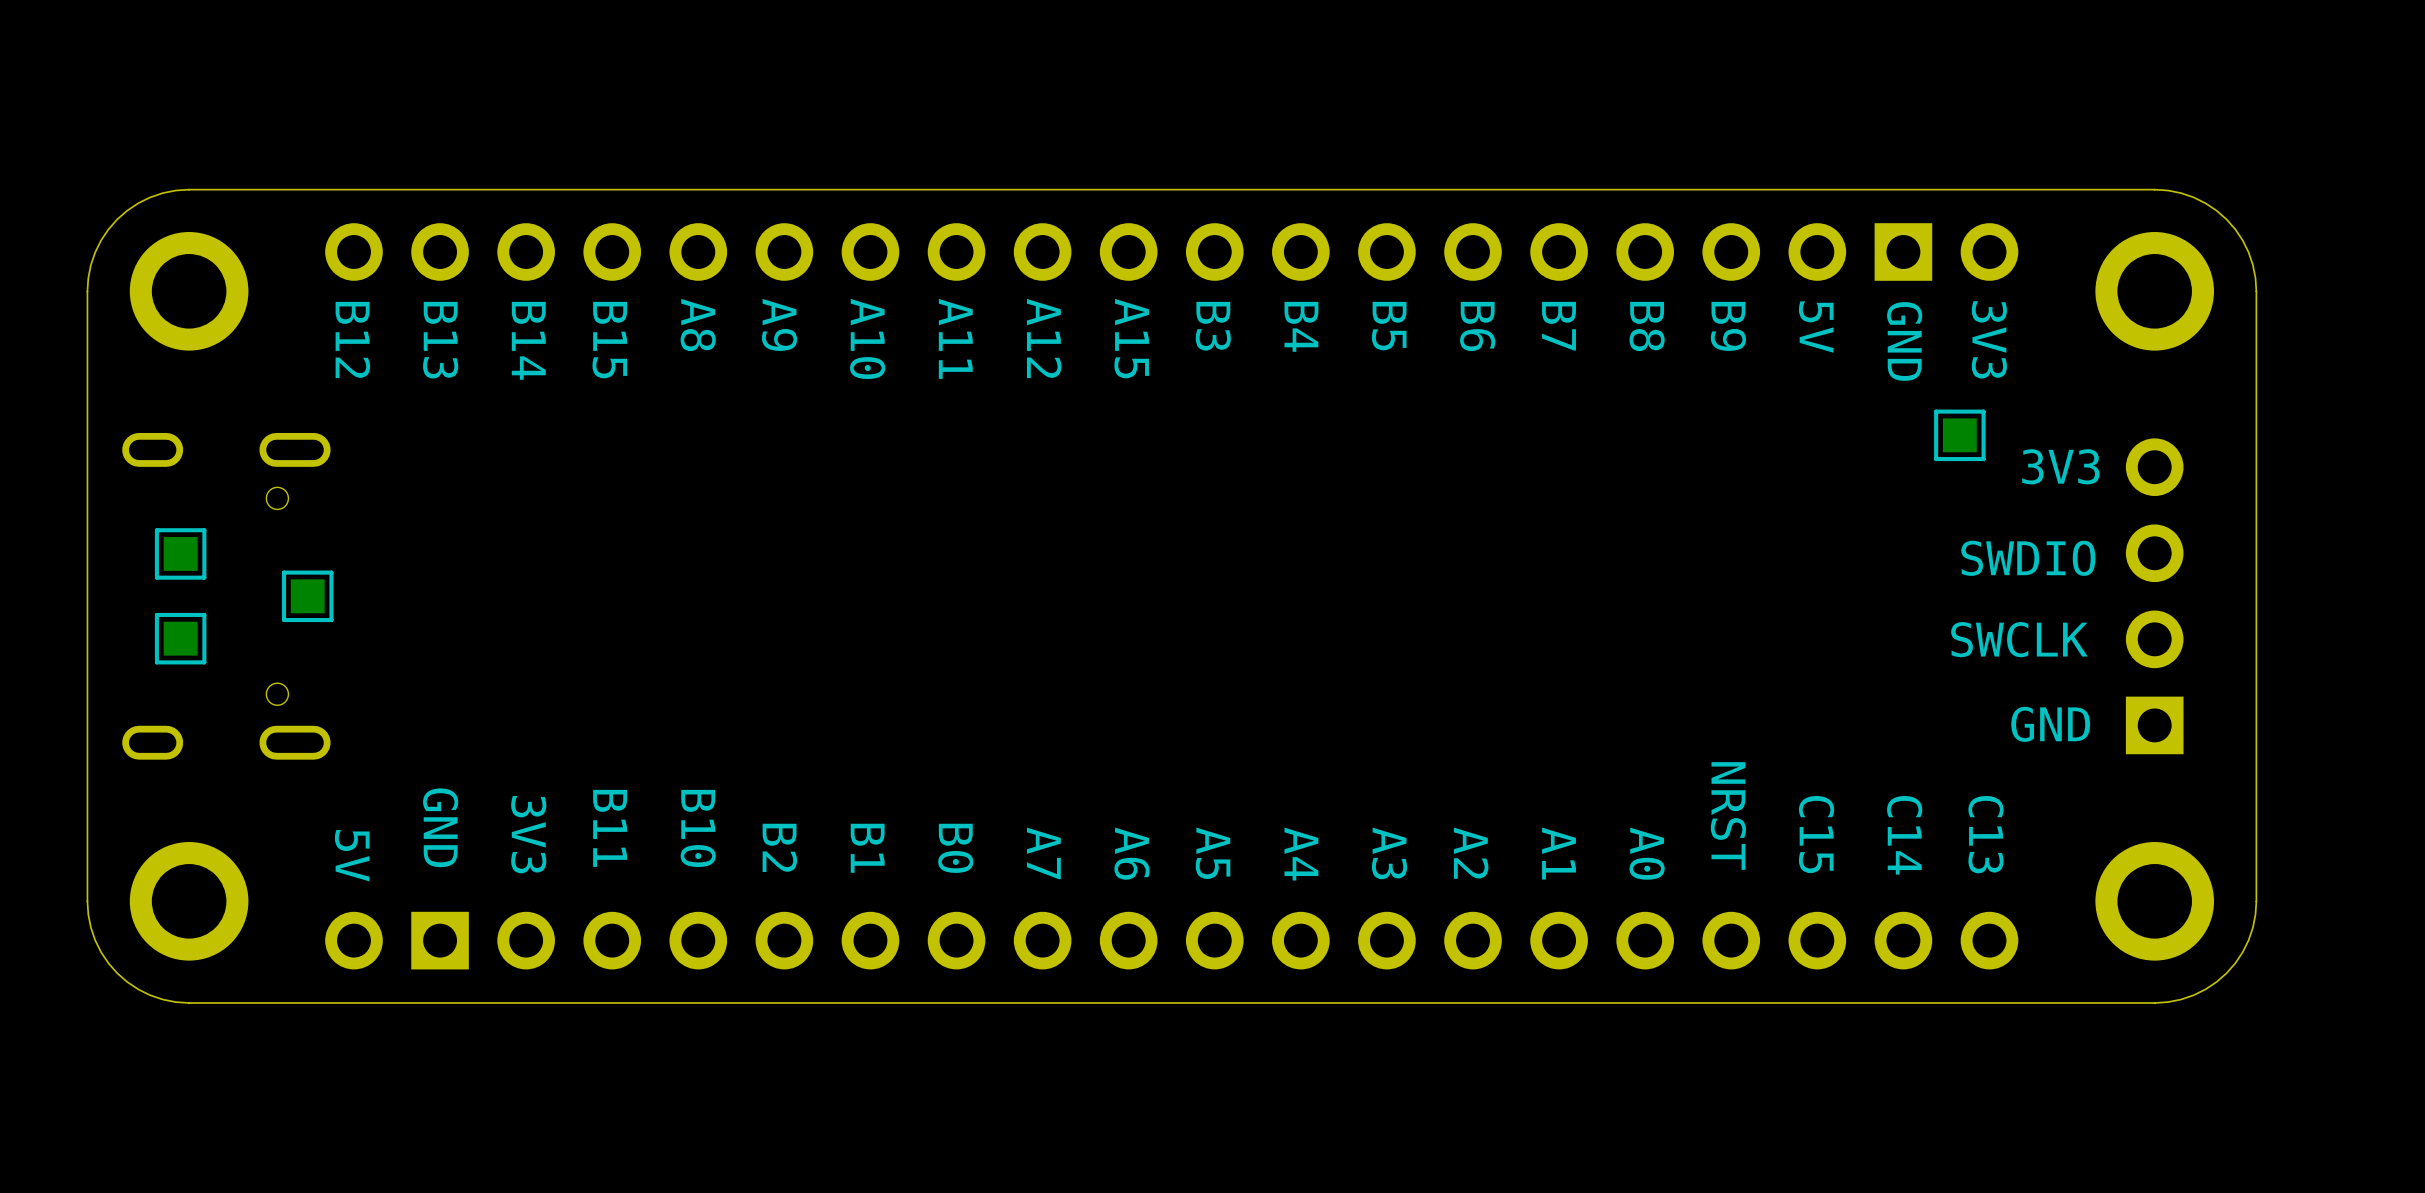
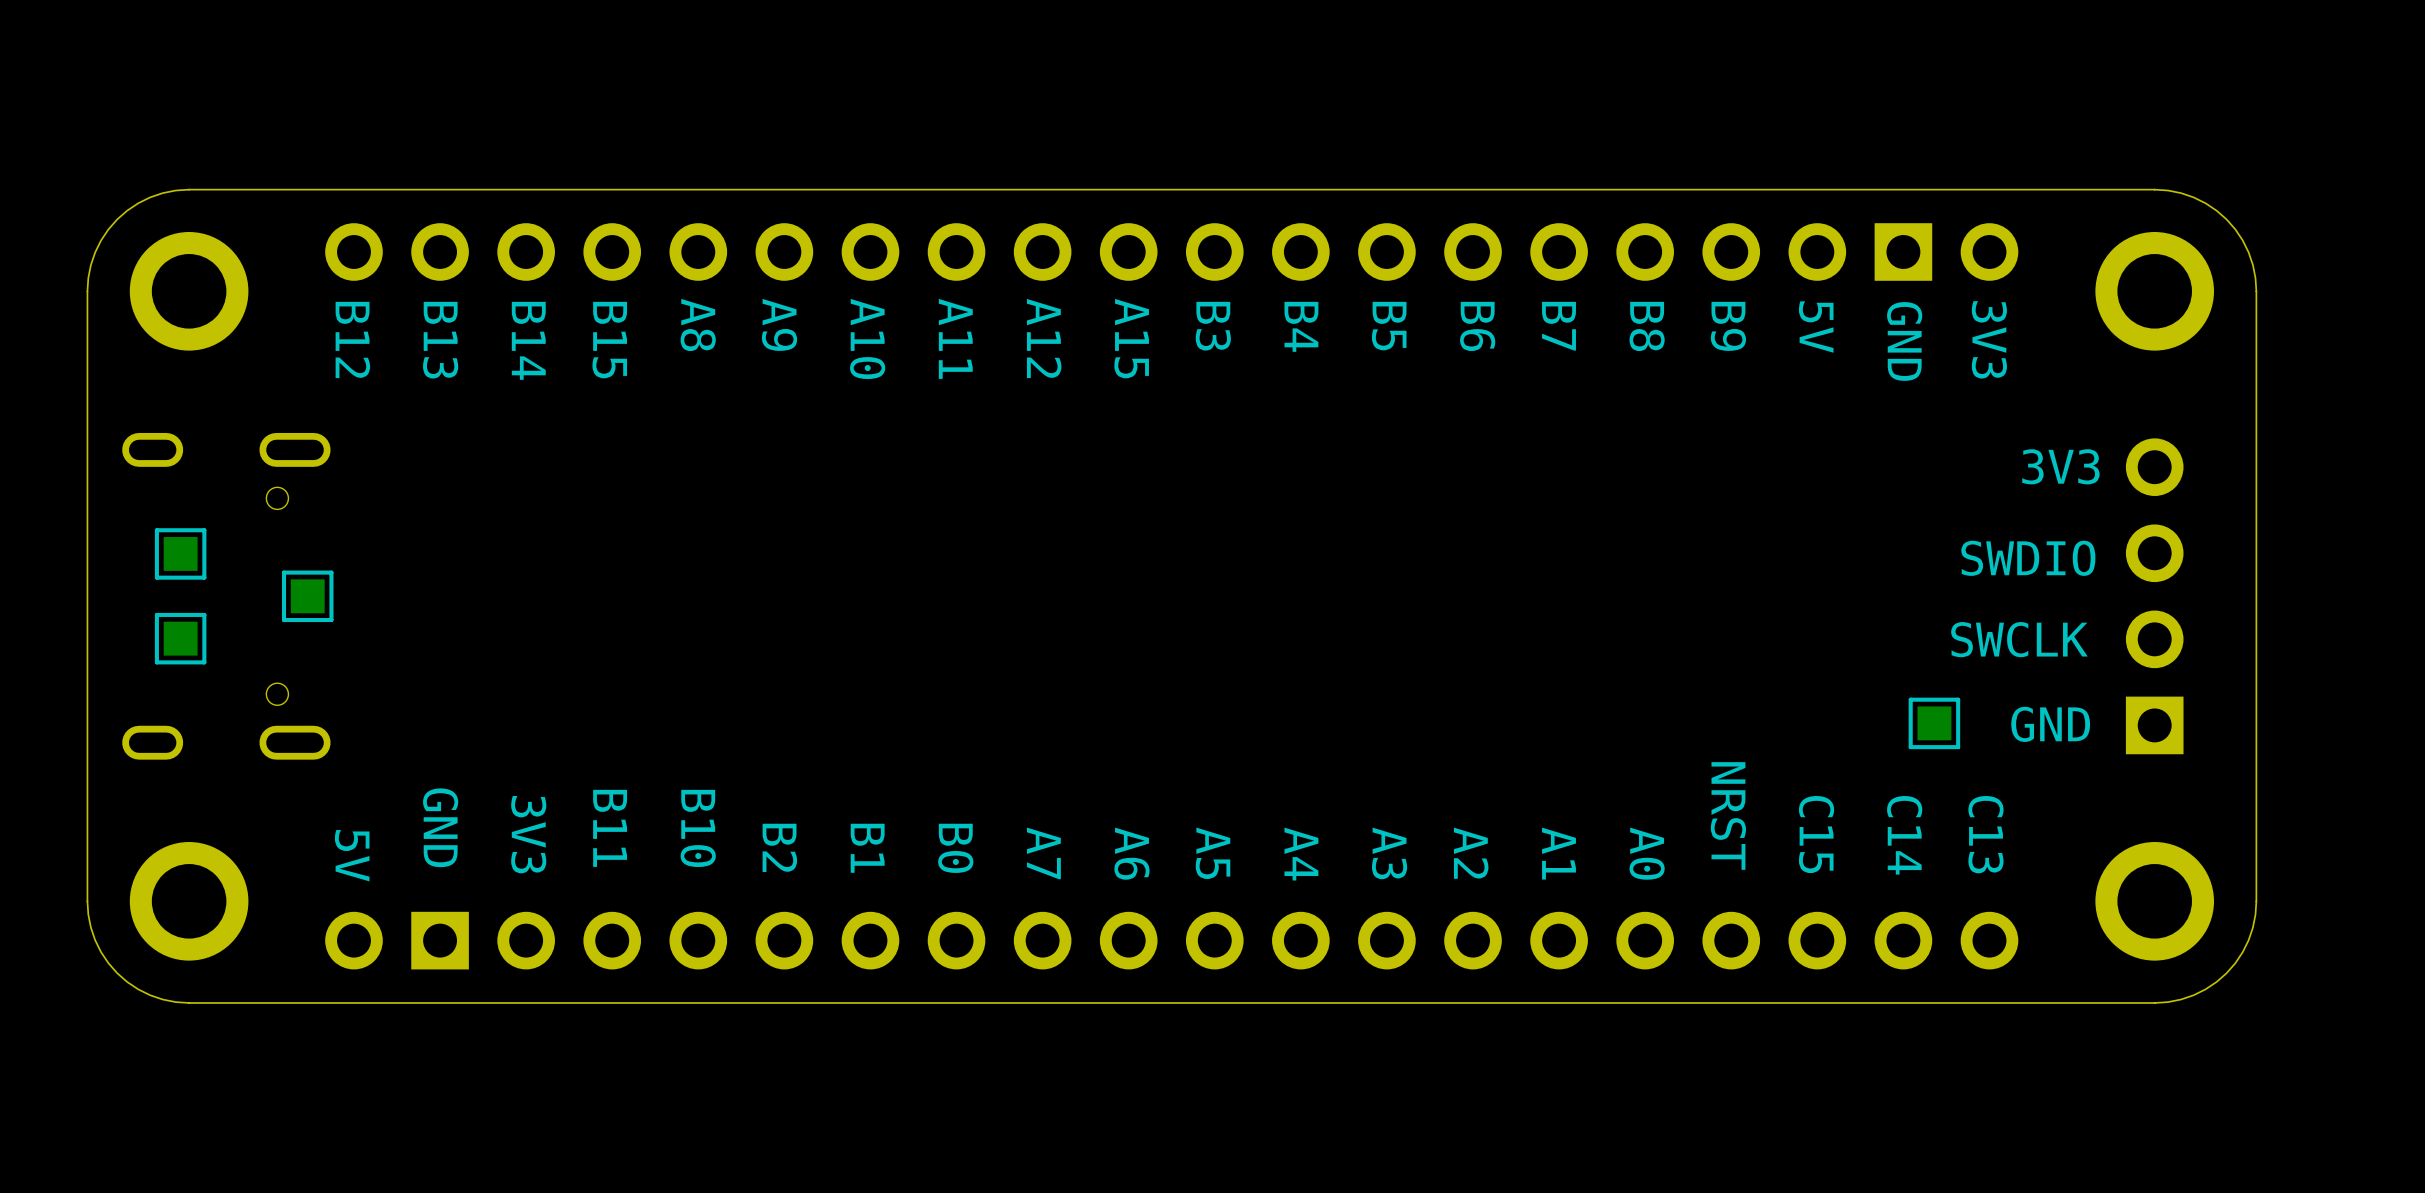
part position: (1959, 435) -> (1934, 723)

